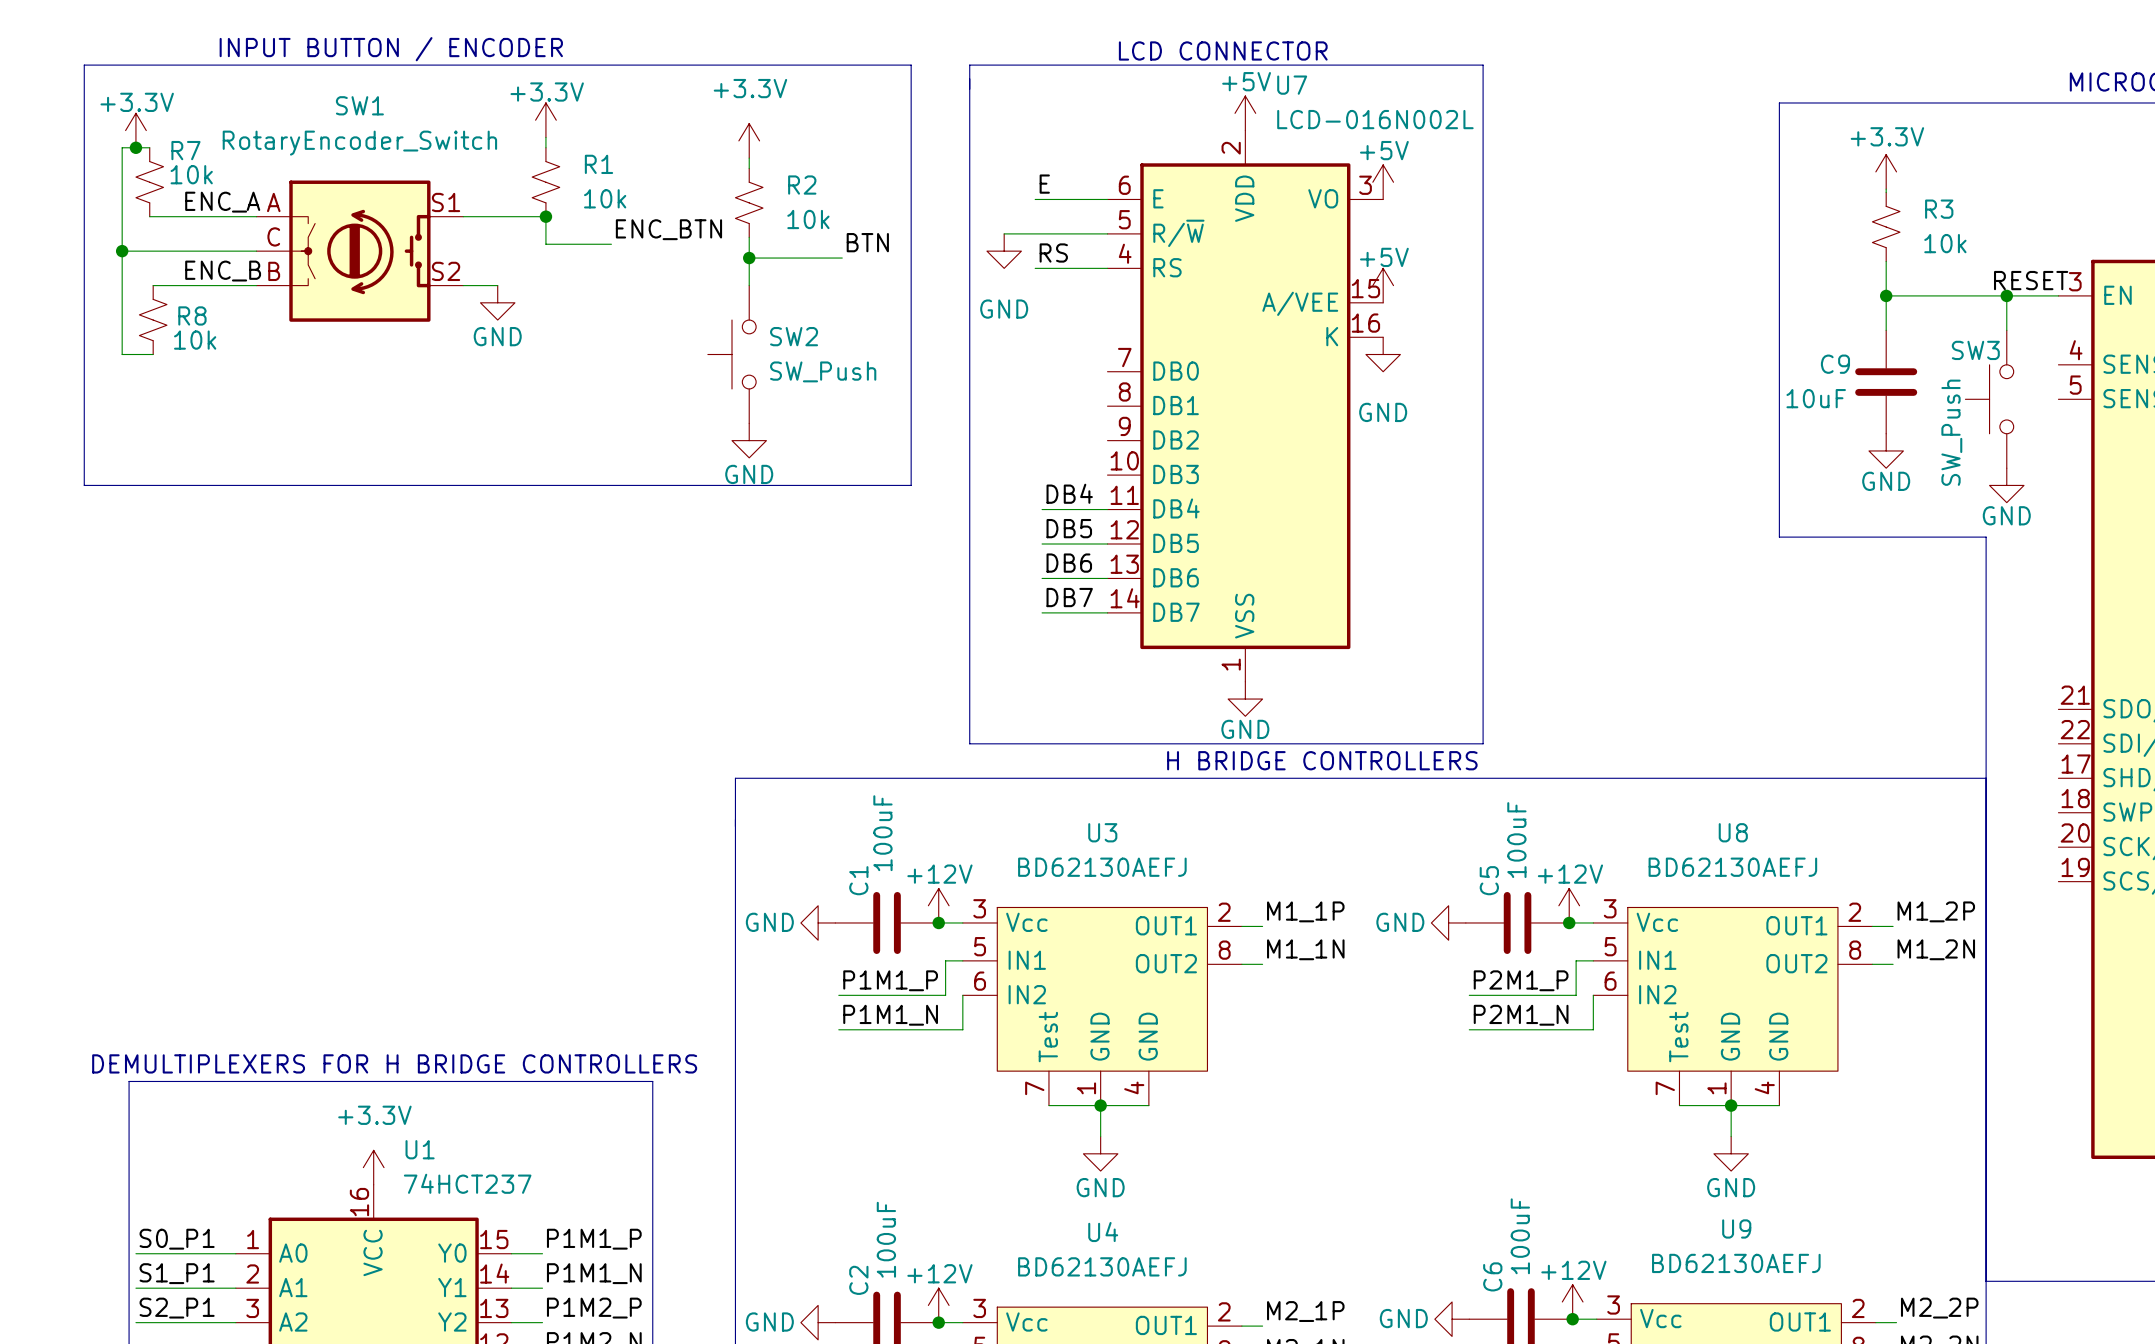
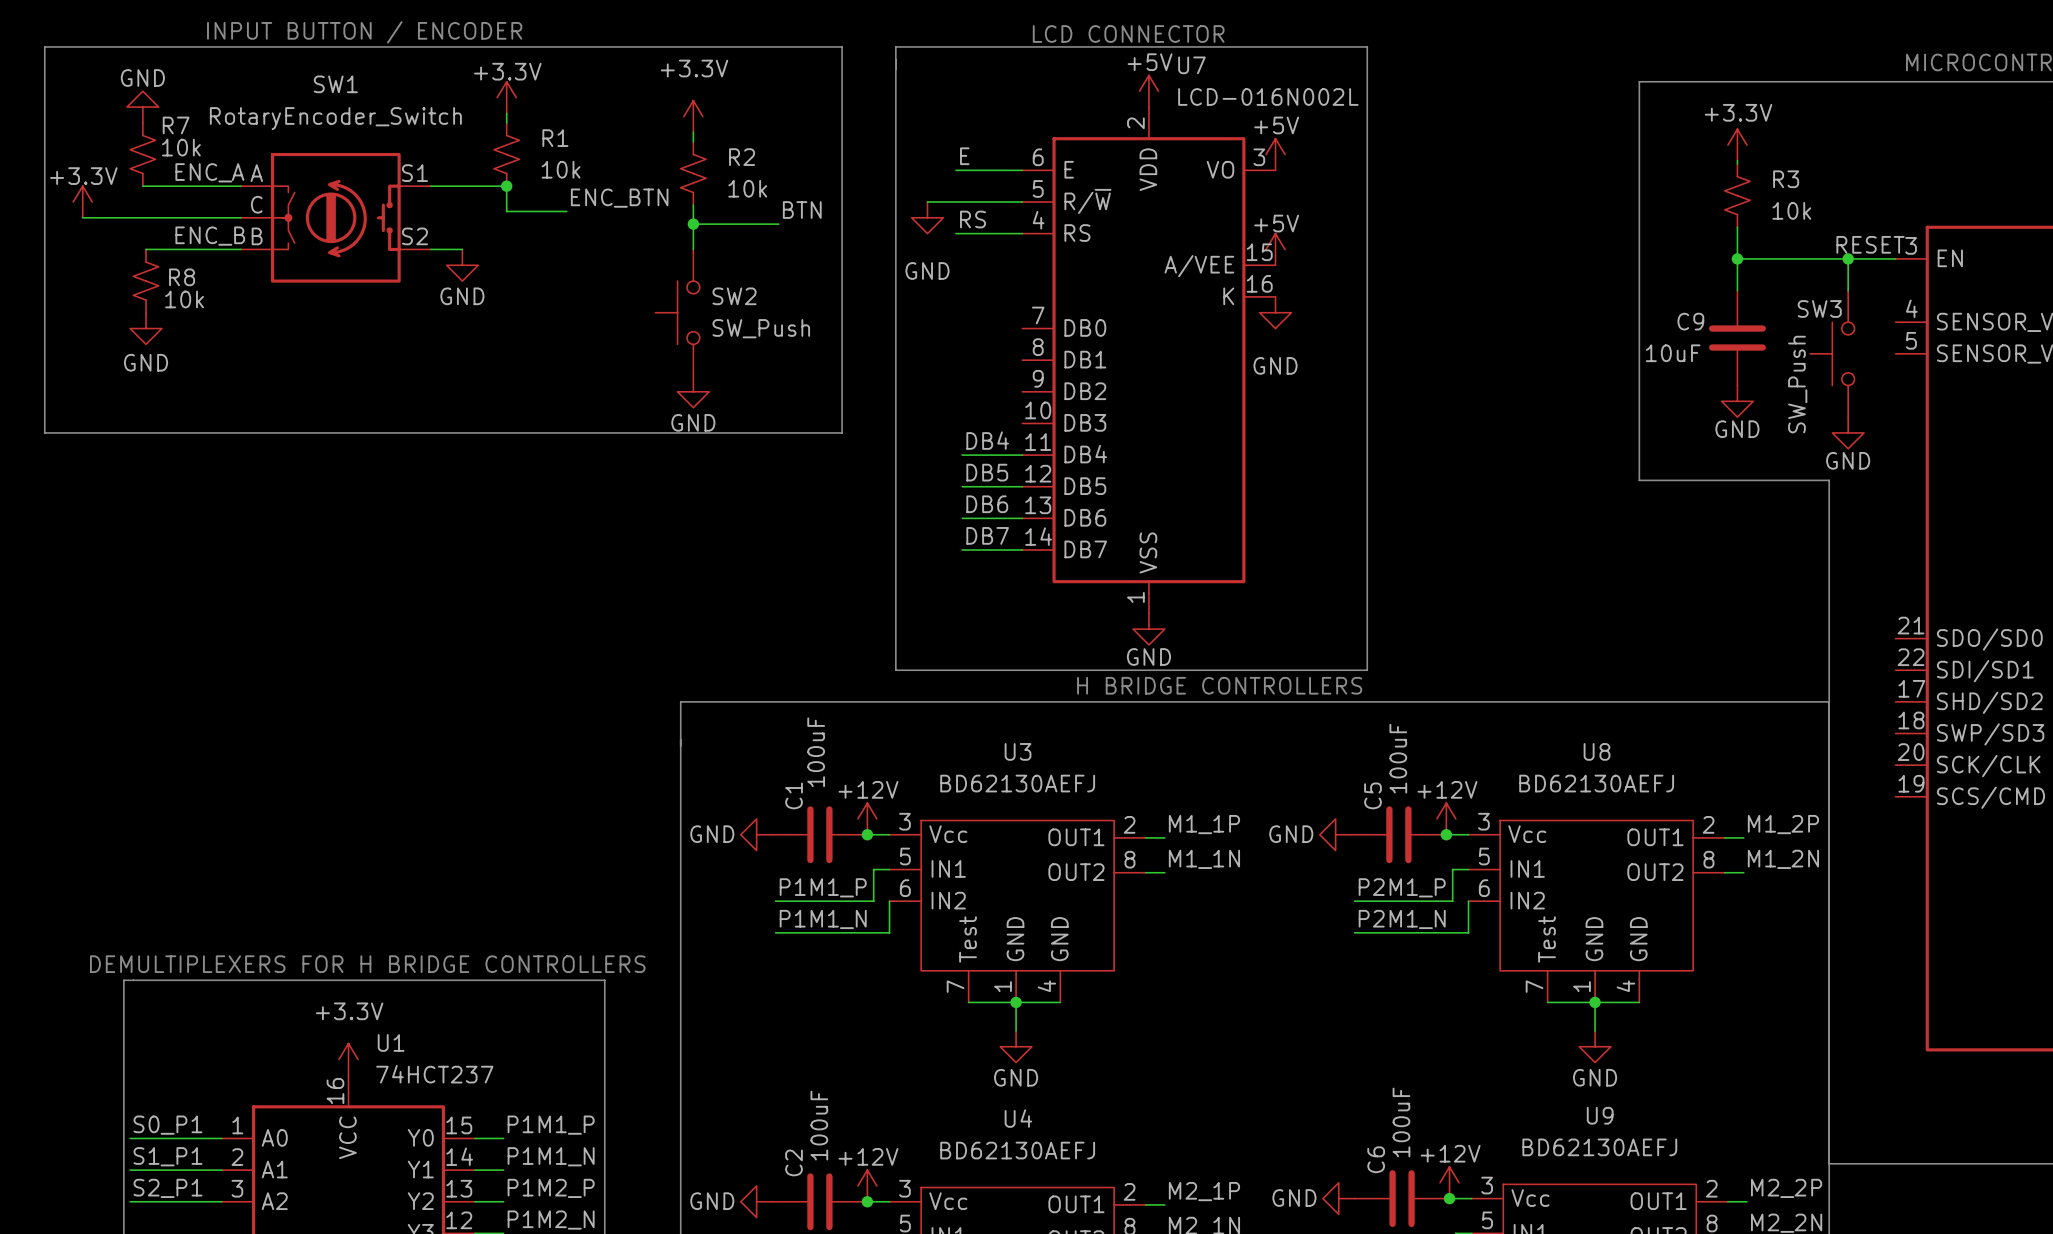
line: (84, 65) (84, 485) -> (82, 46) (44, 46) (44, 432) (82, 432)
power symbol position: +3.3V (135, 130) -> +3.3V (82, 201)
power symbol: none -> GND (142, 107)
junction: (135, 147) -> none
wire: (149, 147) (122, 147) (122, 354) (153, 354) -> none
wire: none -> (82, 217) (117, 217)
junction: (122, 251) -> none
power symbol: none -> GND (146, 328)

